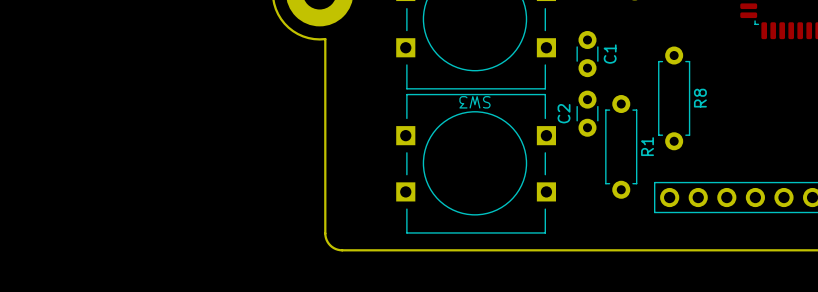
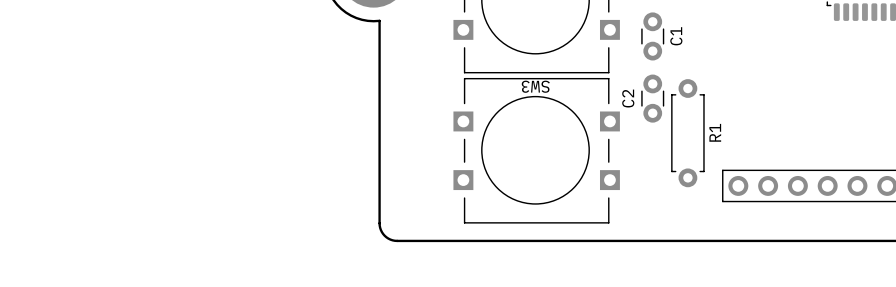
R8: (674, 98) -> none

